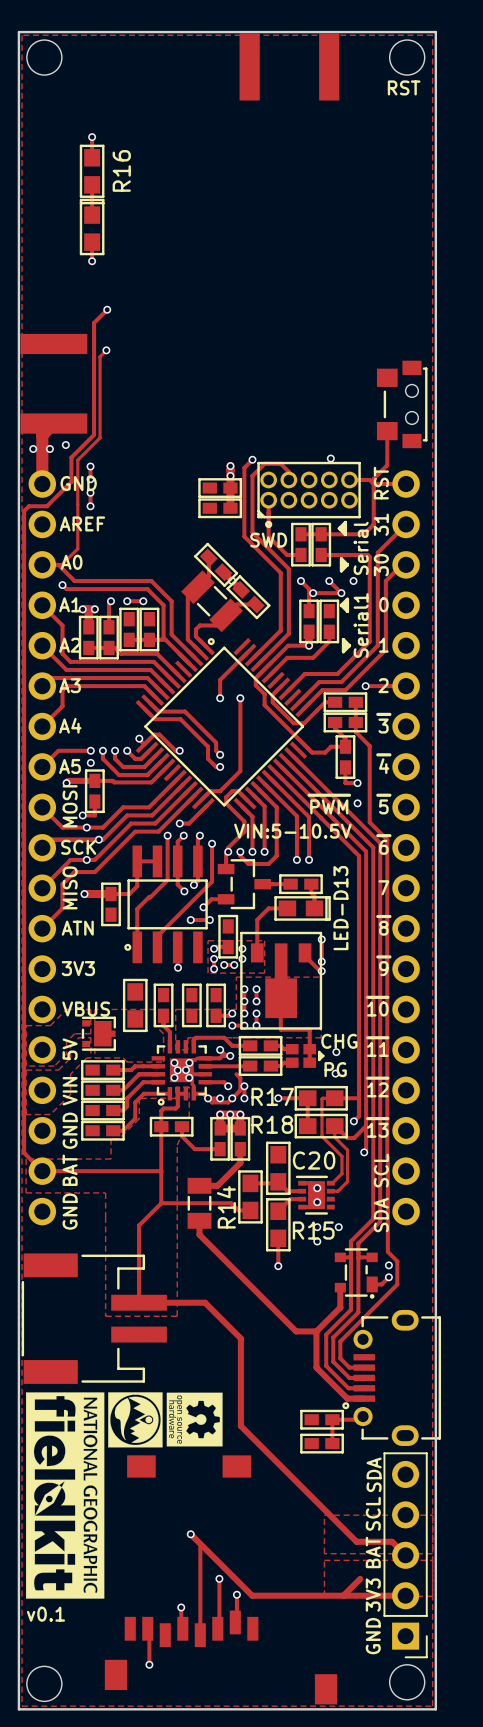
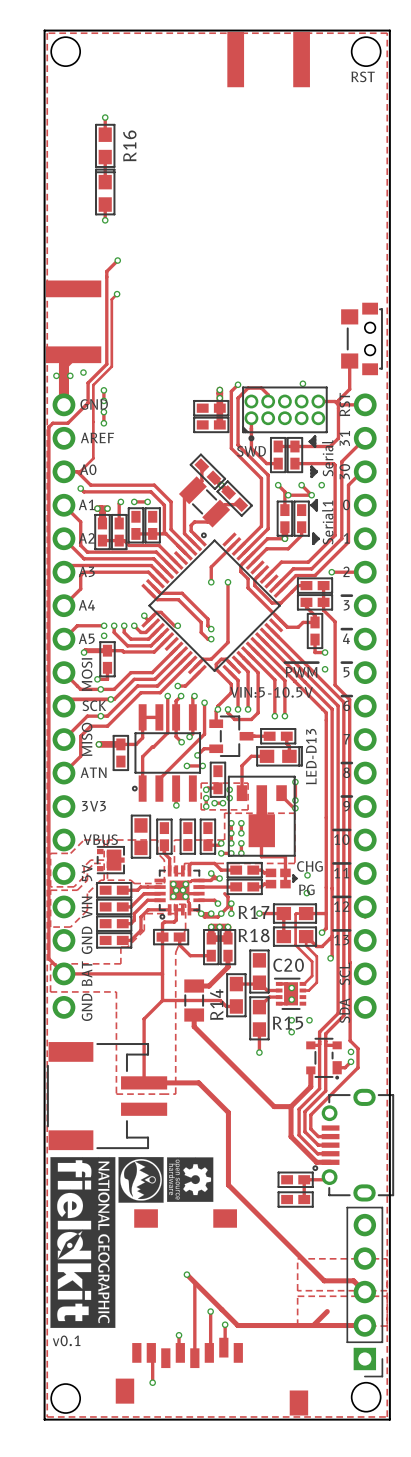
text: SDA (374, 1474) -> none
text: SCL (373, 1513) -> none
text: BAT (373, 1552) -> none
text: 3V3 (373, 1595) -> none
text: GND (373, 1636) -> none

